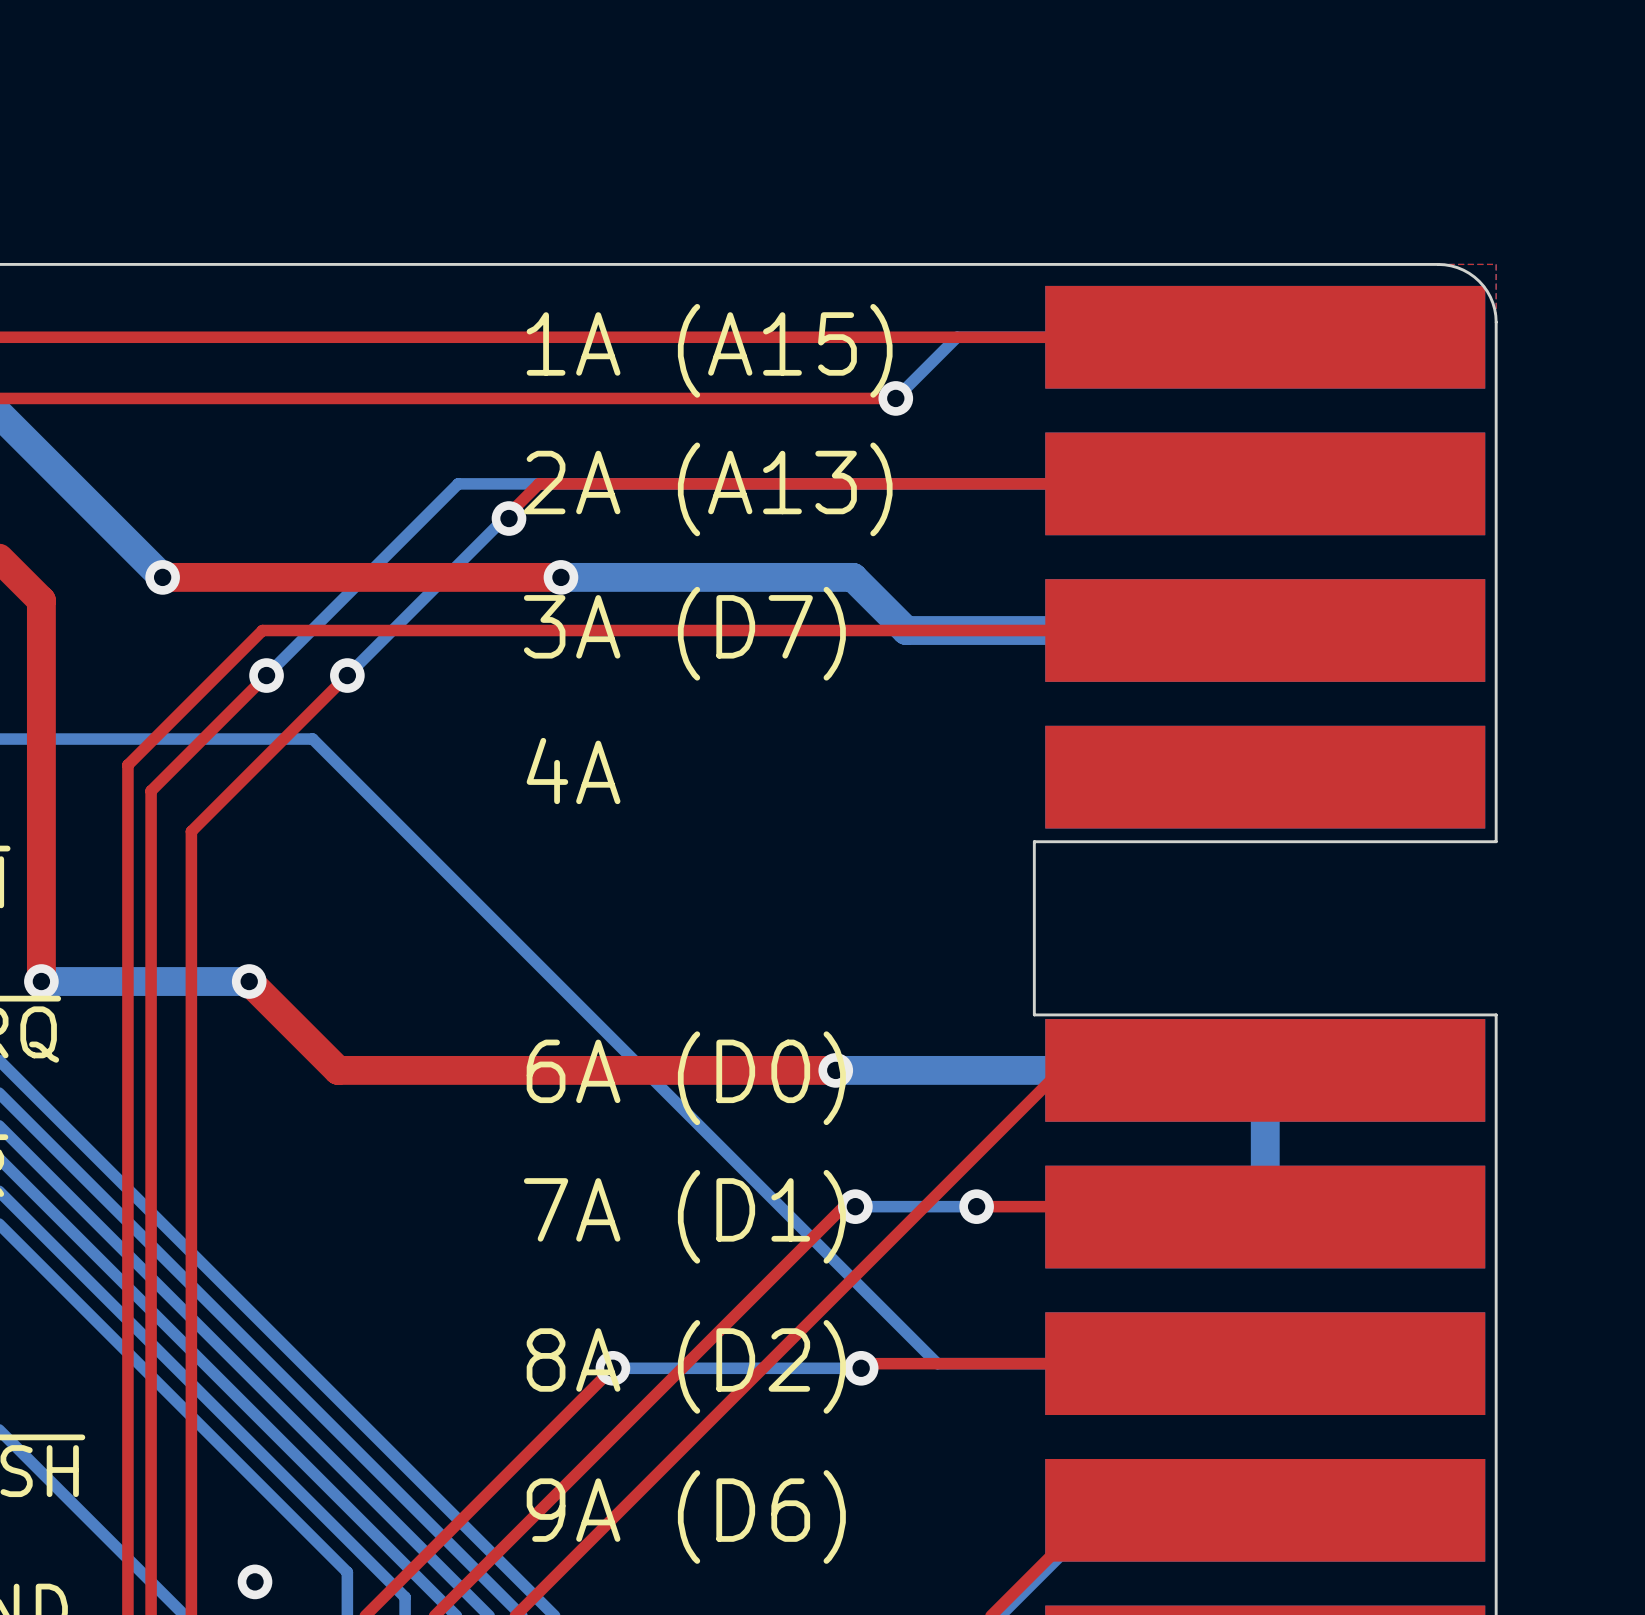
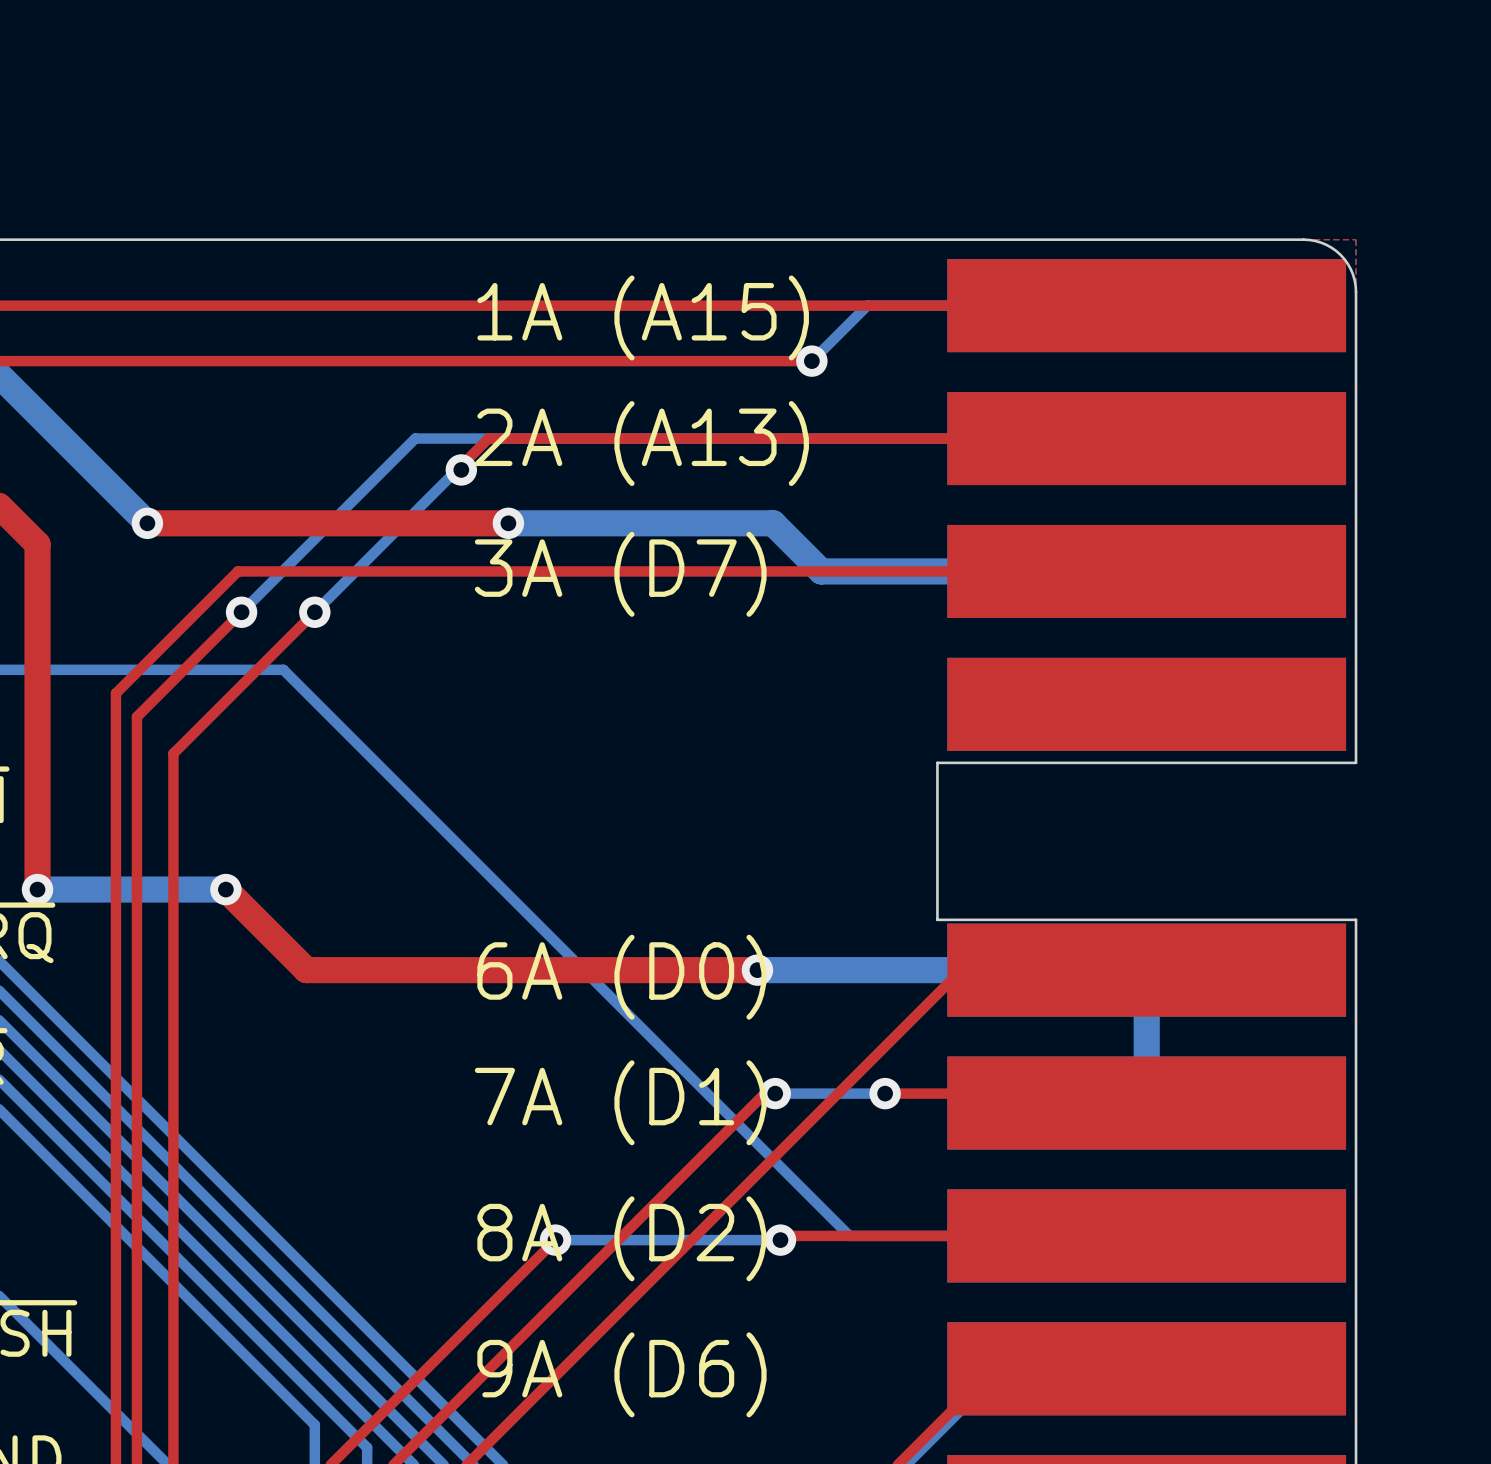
text: 4A (573, 771) -> none
via: (255, 1581) -> none

